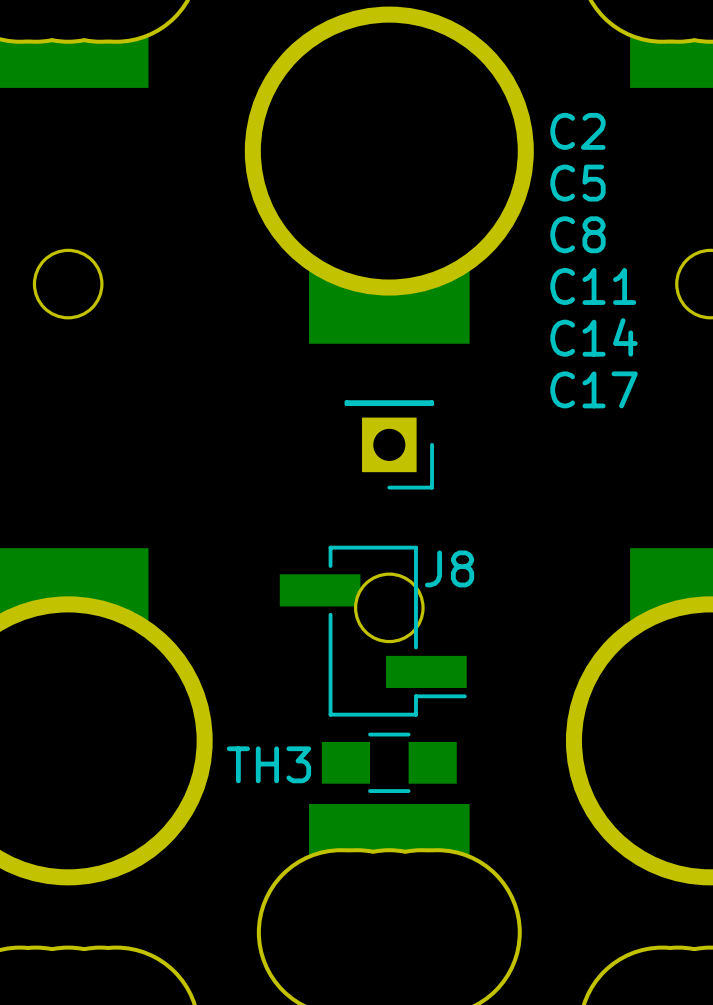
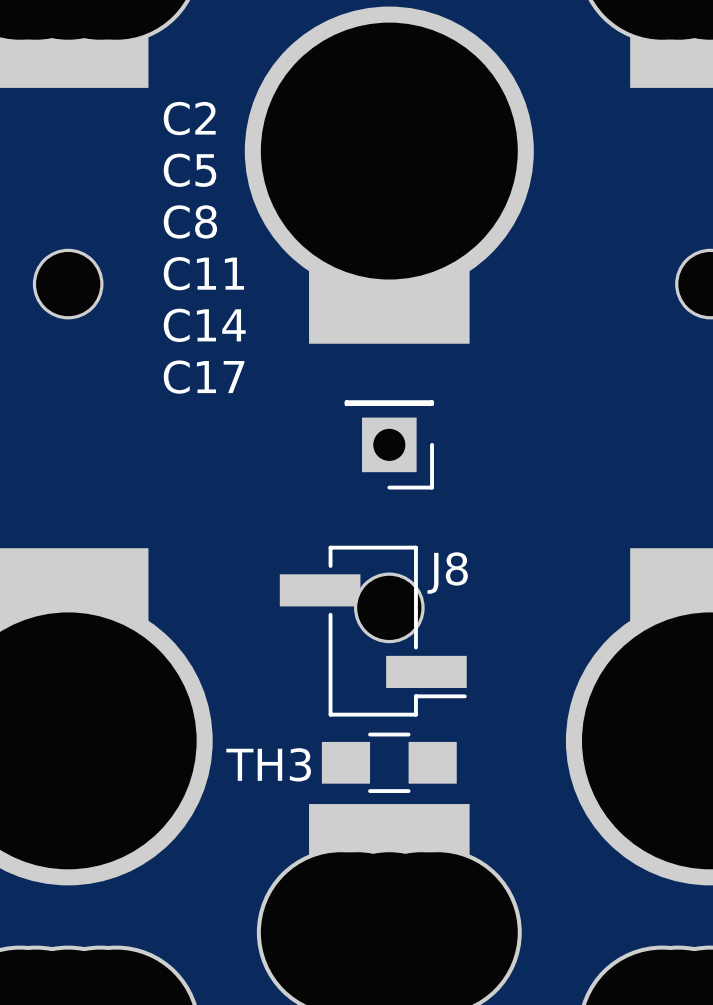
text position: C2 (577, 131) -> C2 (189, 118)
text position: C5 (577, 183) -> C5 (190, 170)
text position: C8 (577, 234) -> C8 (190, 221)
text position: C11 (593, 286) -> C11 (203, 273)
text position: C14 (594, 337) -> C14 (204, 325)
text position: C17 (594, 389) -> C17 (204, 377)

